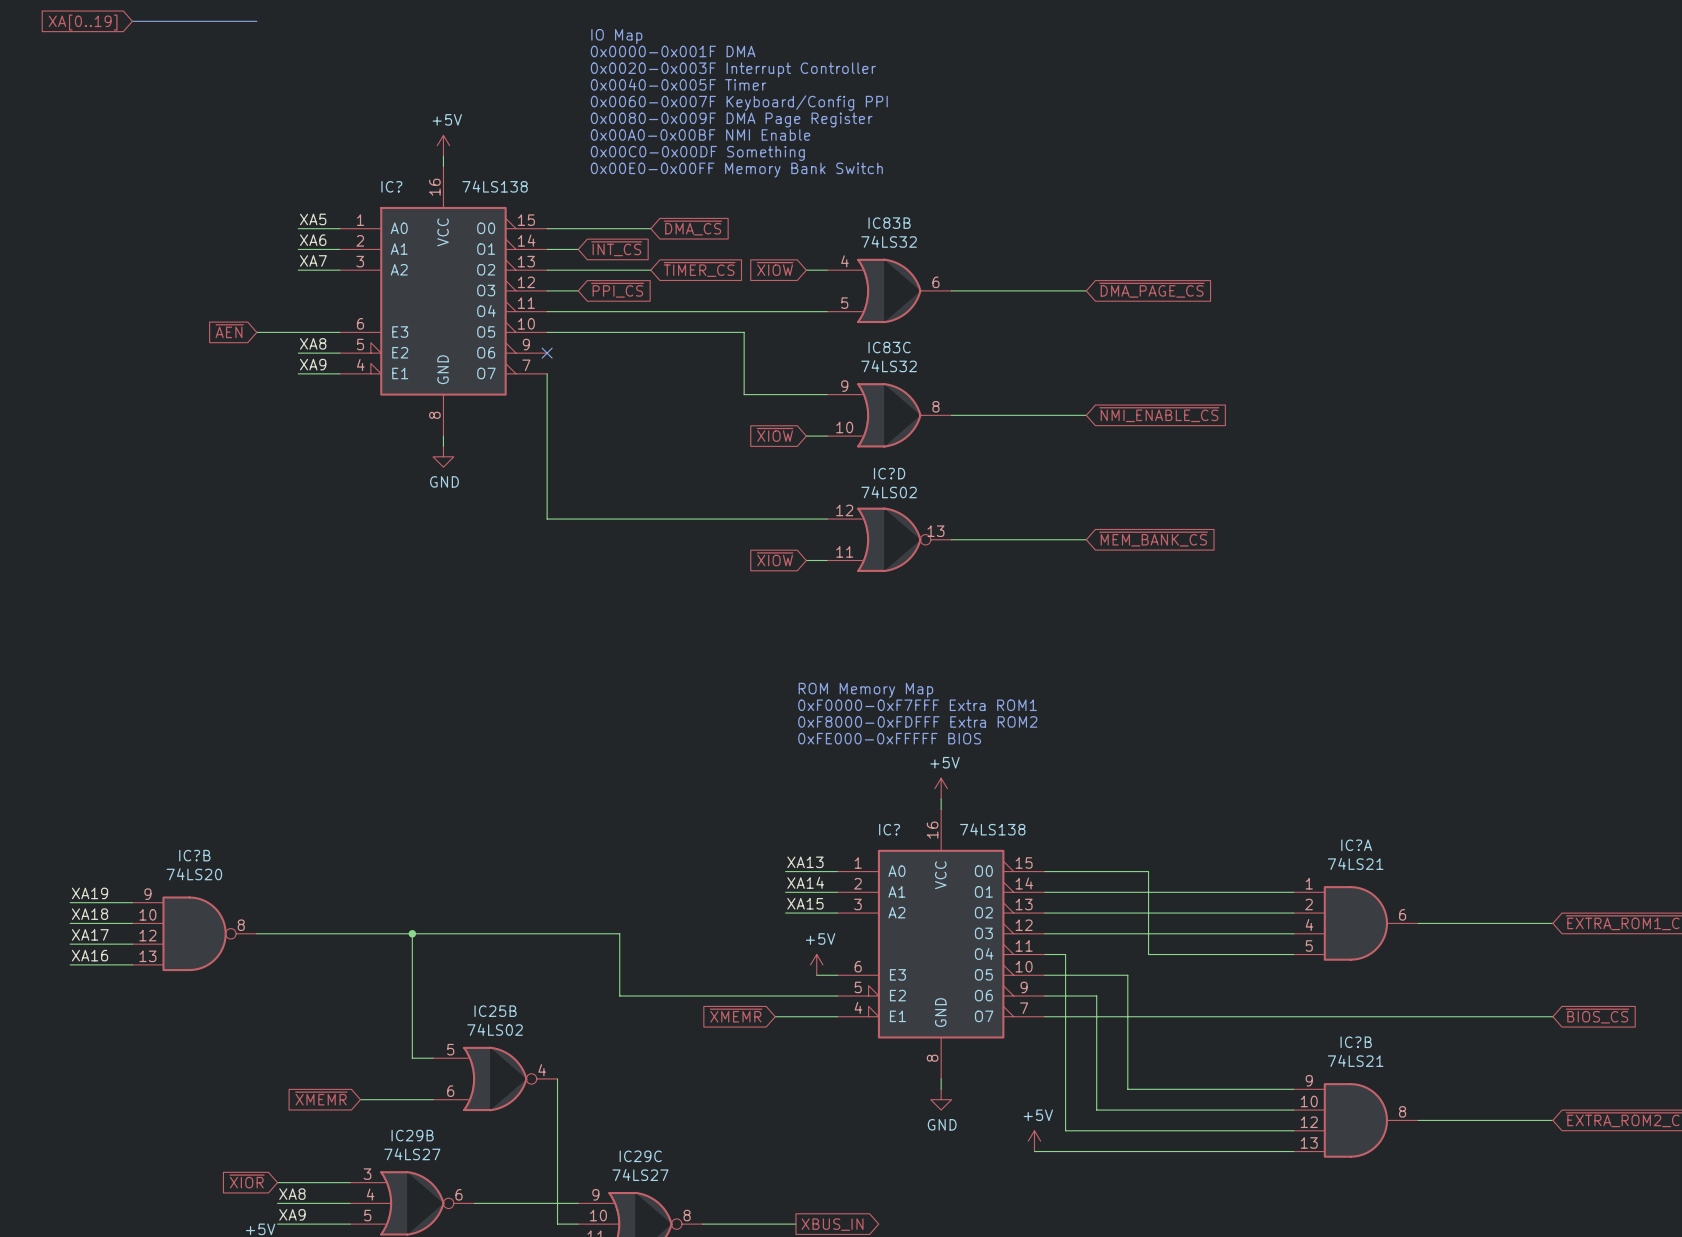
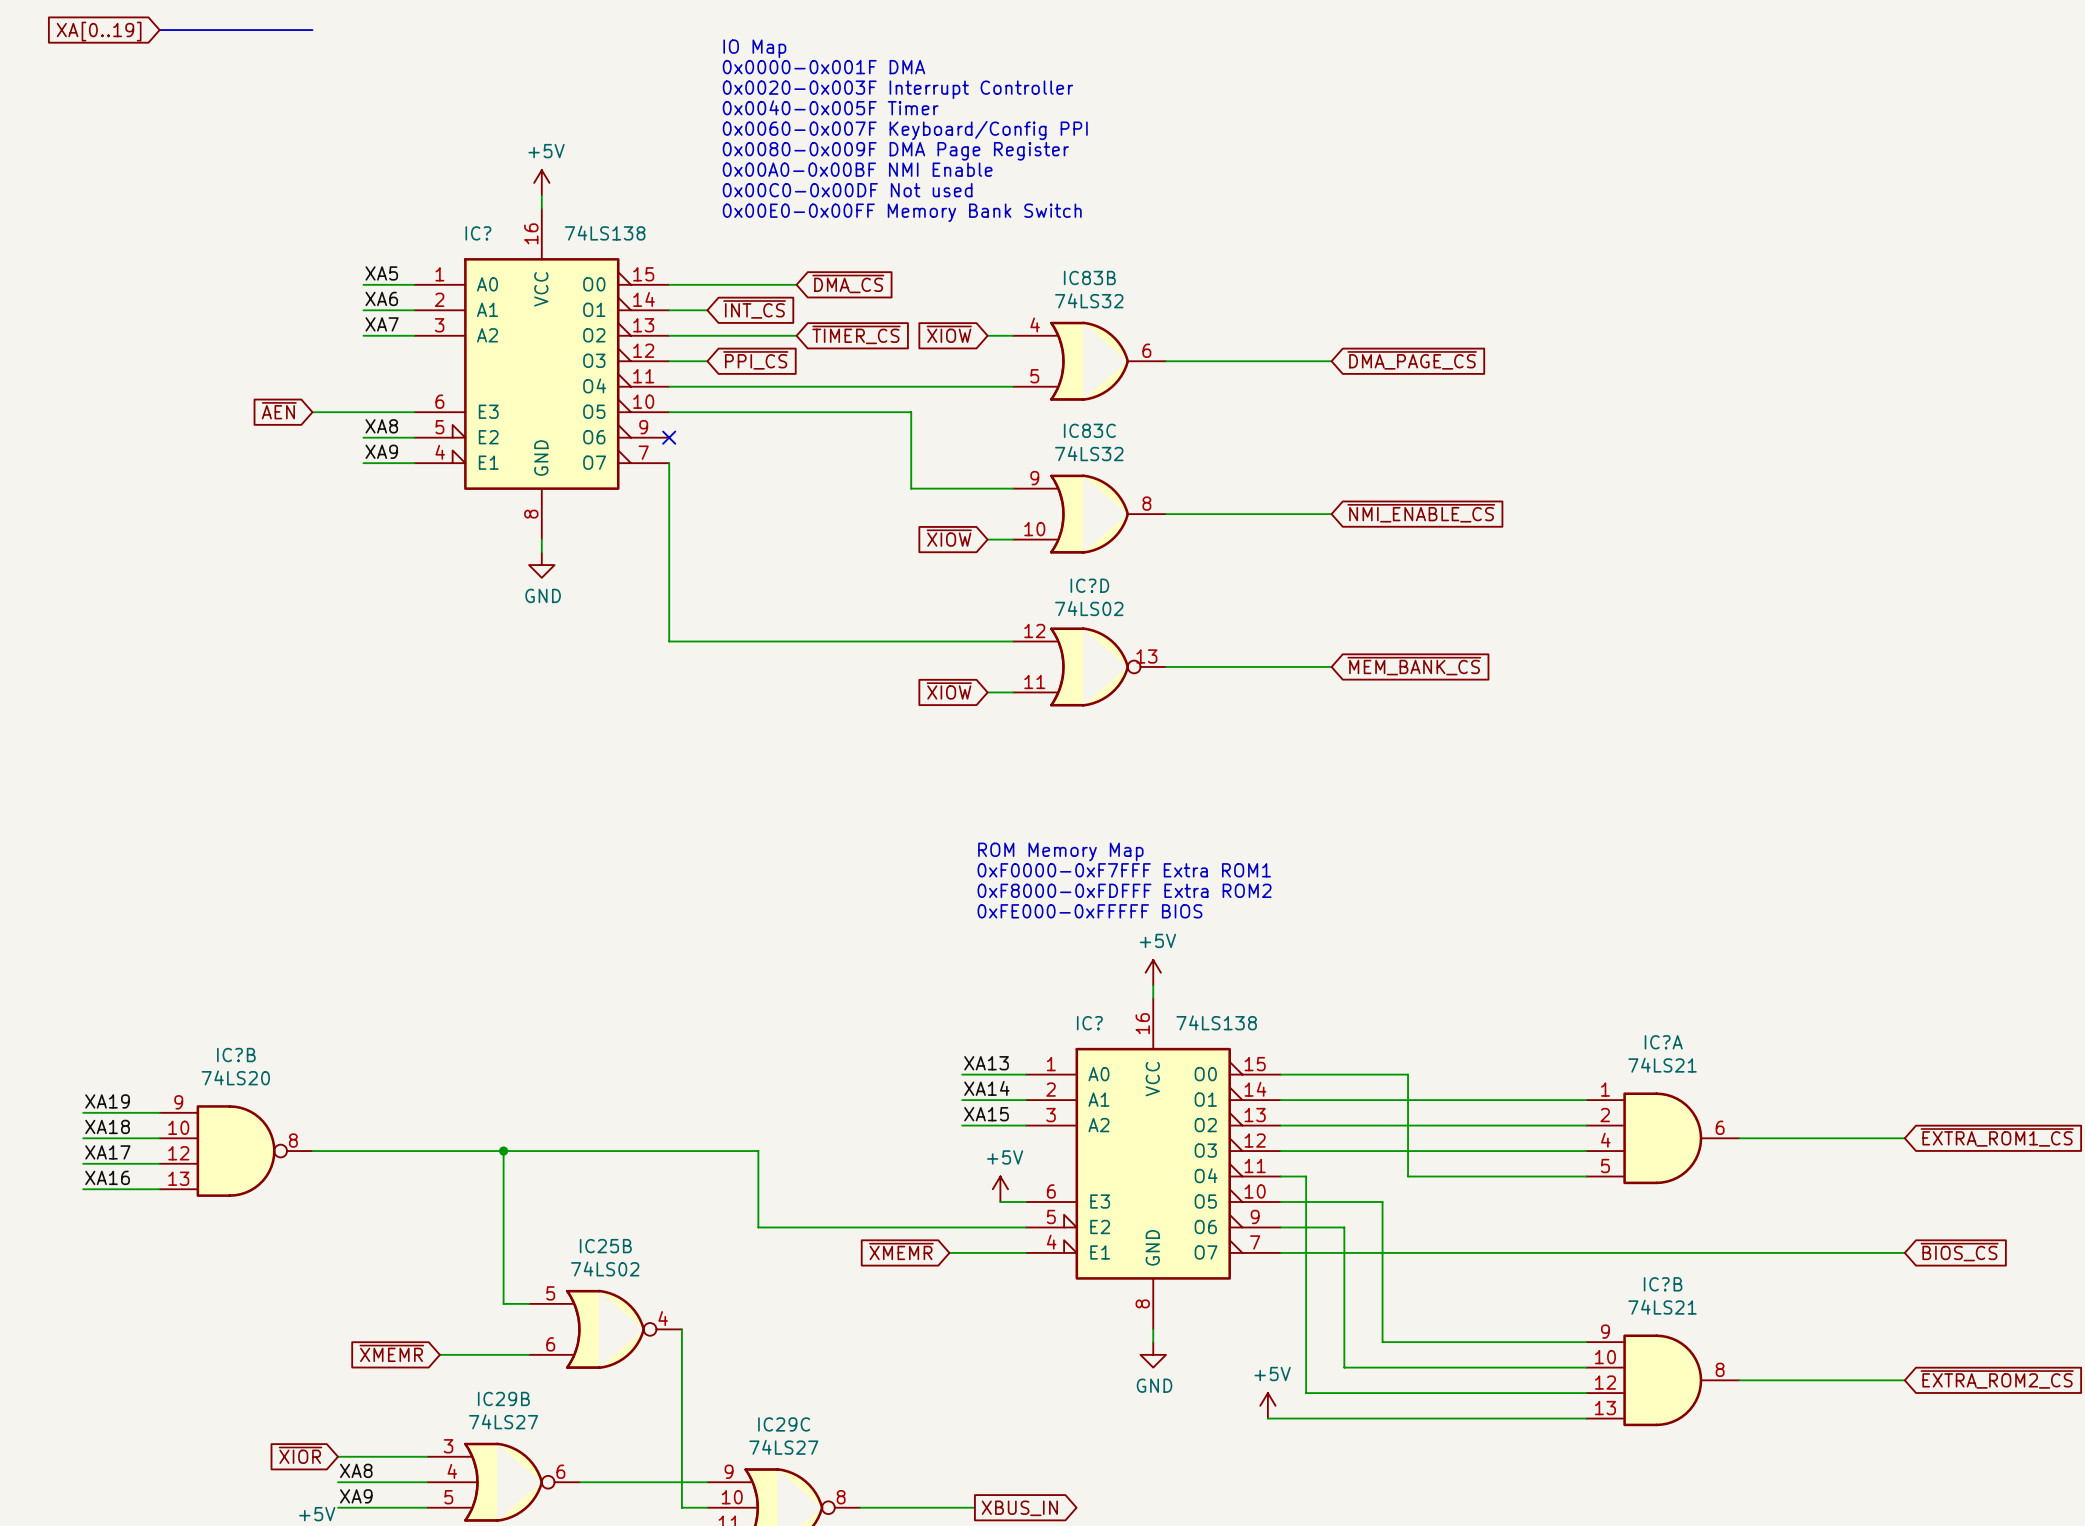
text: 0x00C0-0x00DF Something (697, 153) -> 0x00C0-0x00DF Not used (847, 190)

